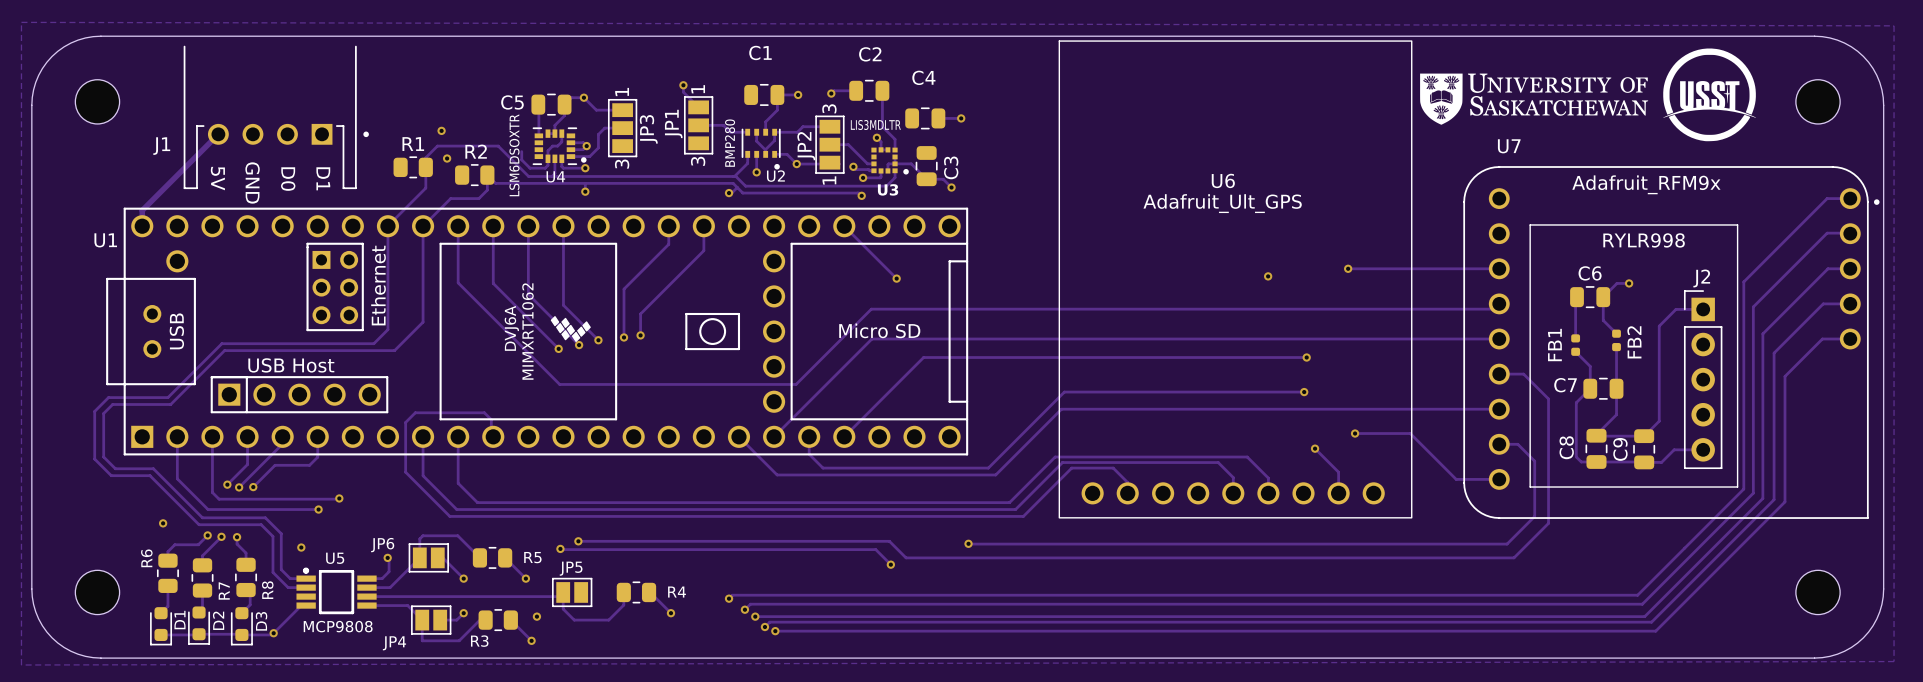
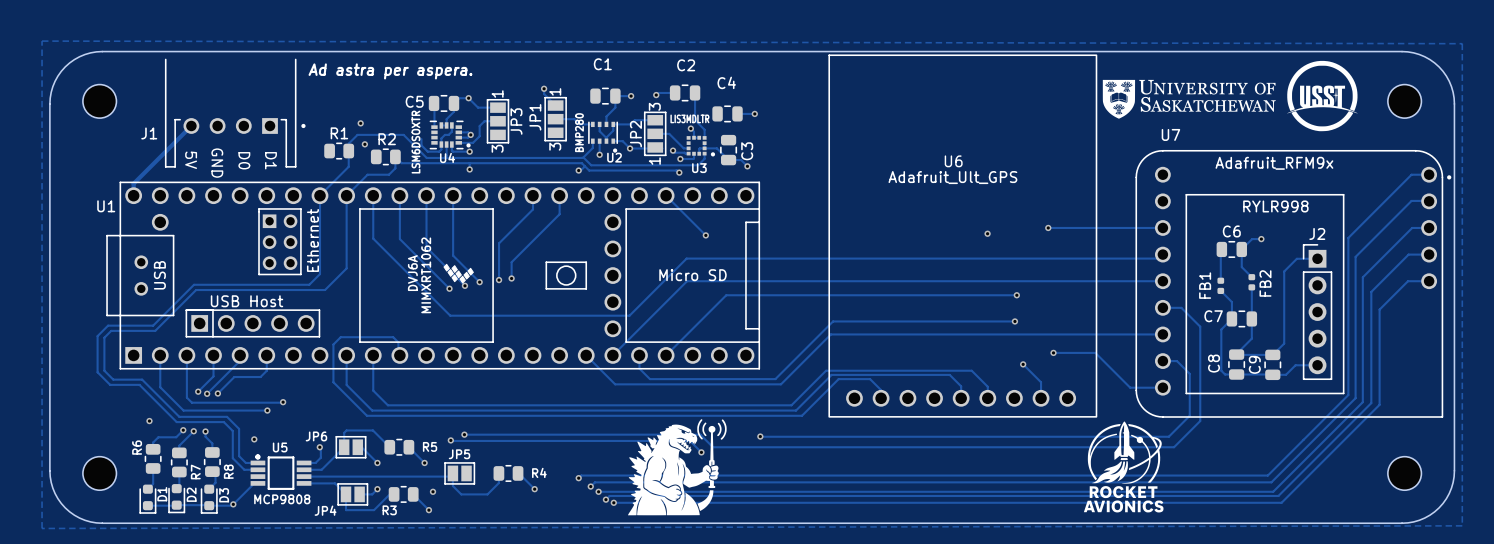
text: none -> Ad astra per aspera. (390, 71)
drawing: none -> [627, 419, 727, 516]
drawing: none -> [1083, 421, 1164, 513]

